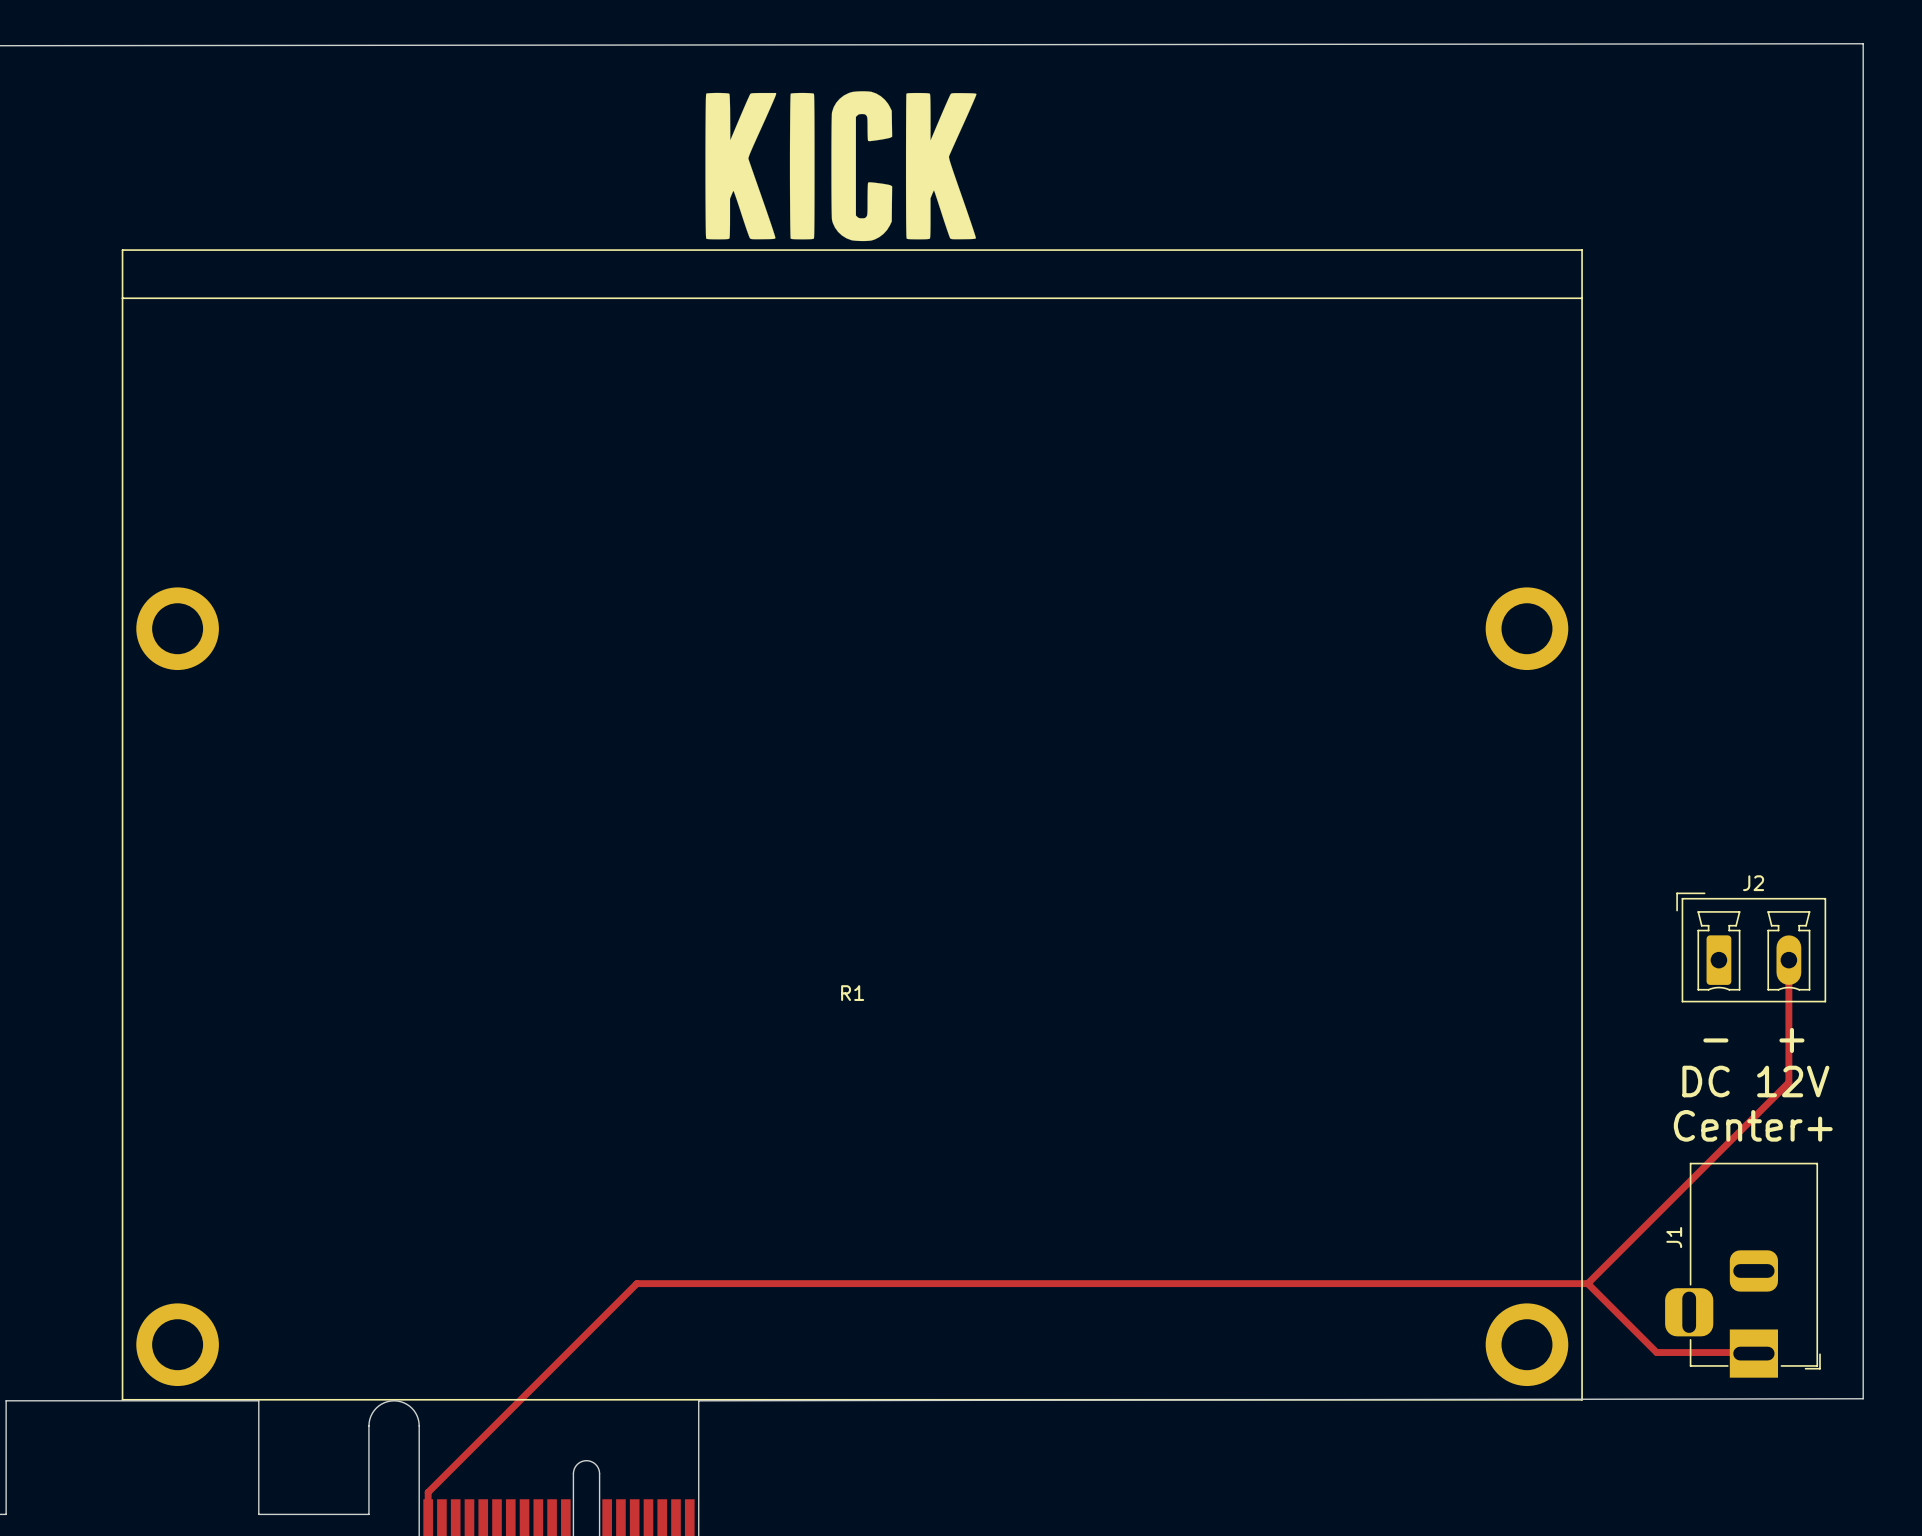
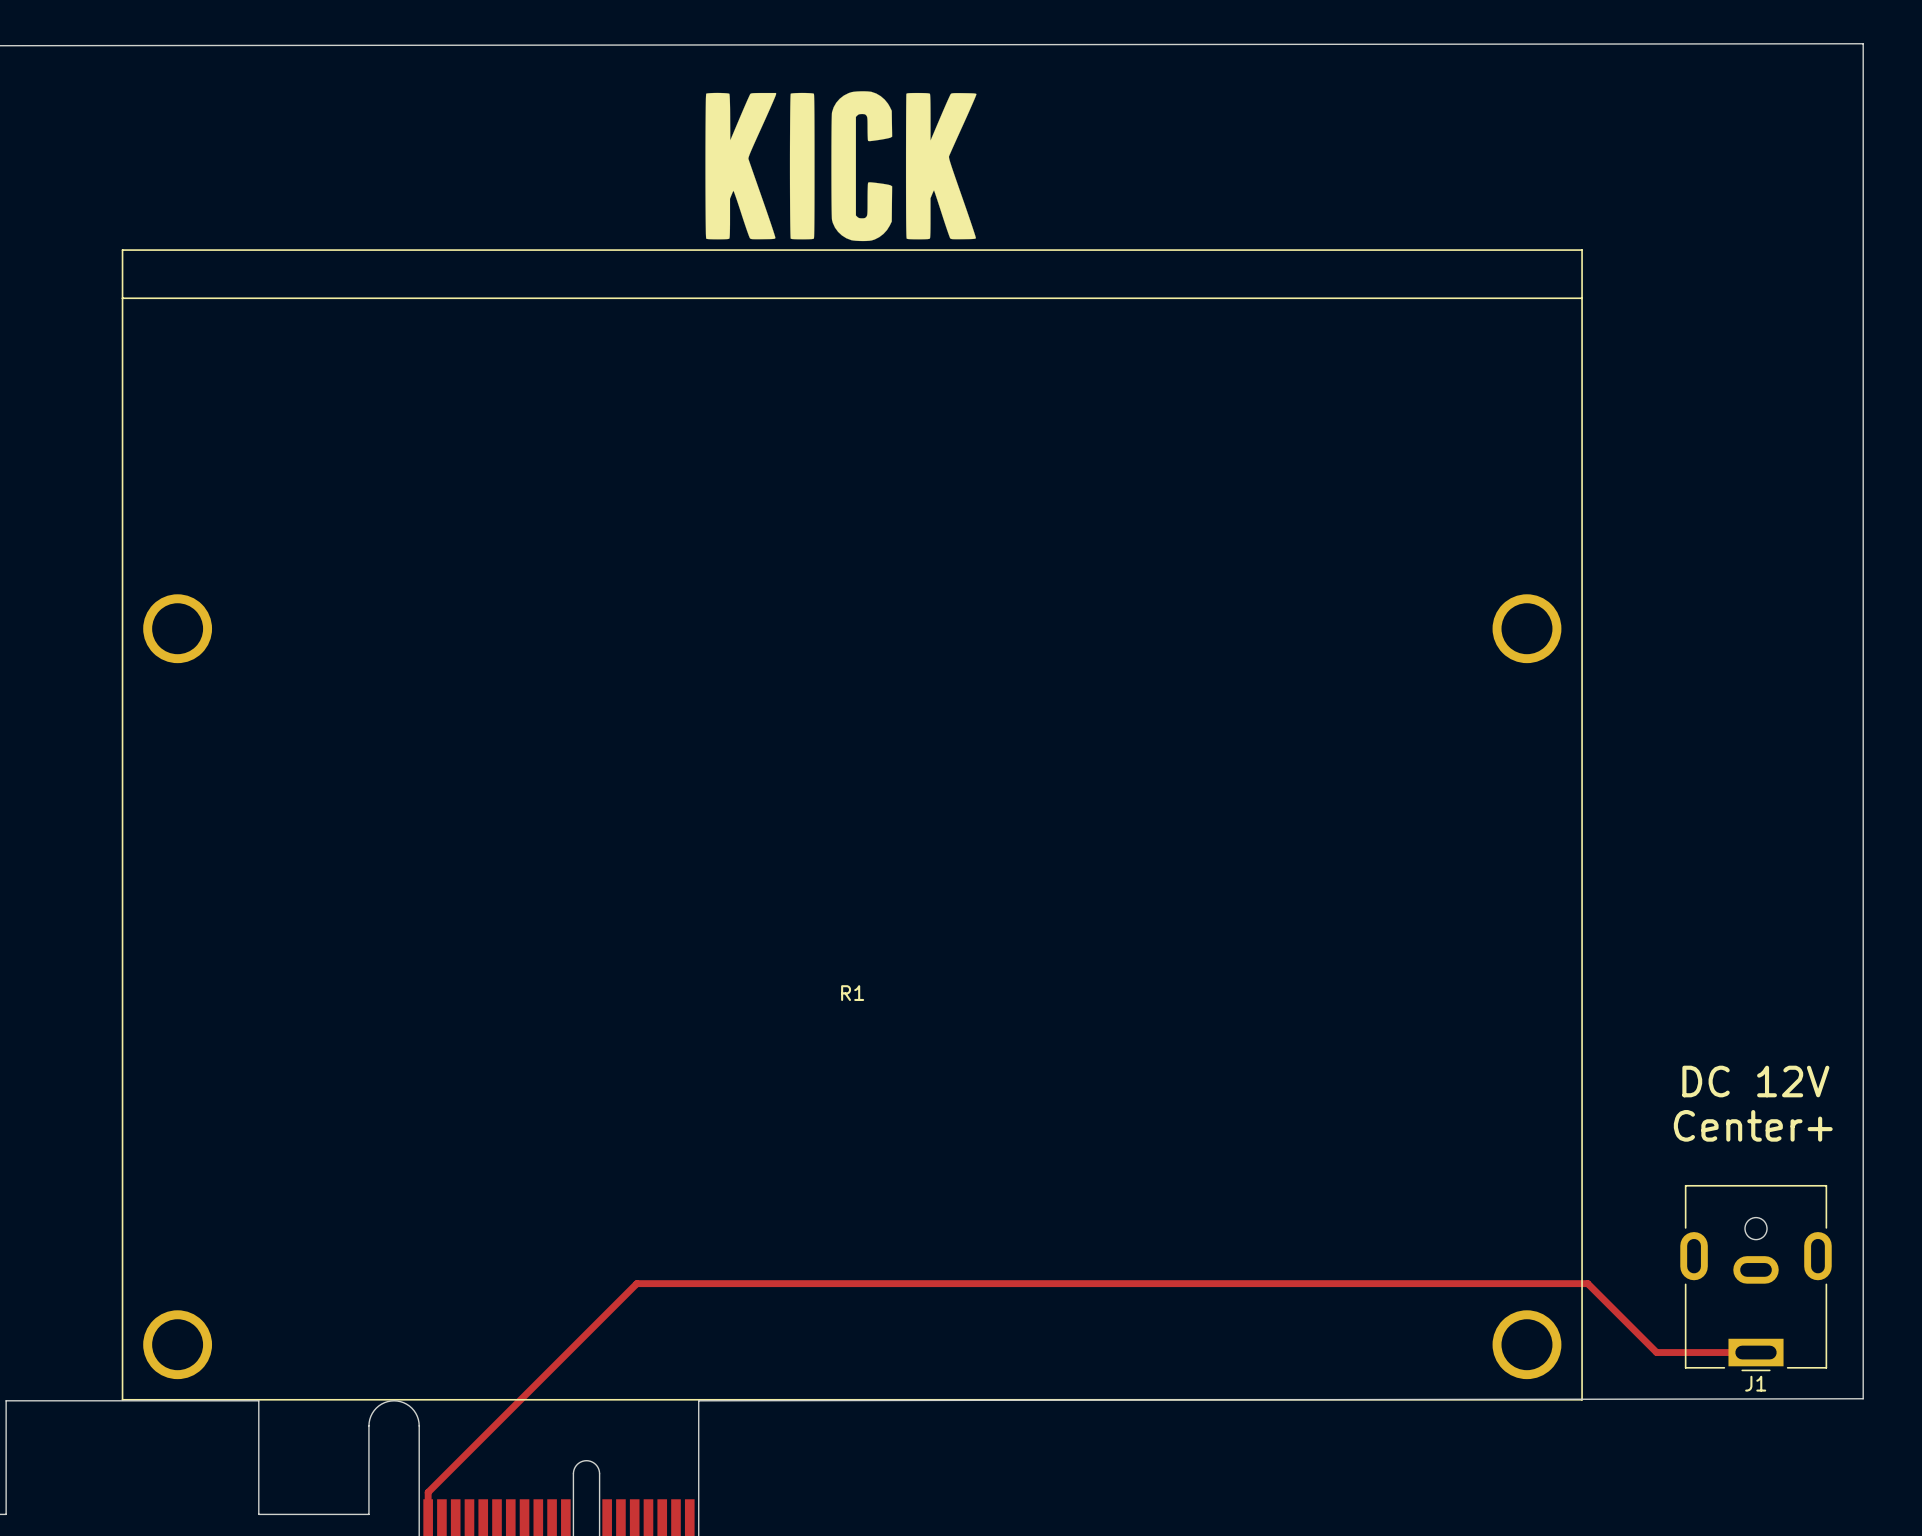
R1 footprint: [121, 249, 1583, 1401] -> [121, 249, 1583, 1401]
J2: (1751, 947) -> none
track: (1788, 960) (1788, 1082) (1587, 1283) -> none
text: - + (1753, 1040) -> none
J1 footprint: [1665, 1162, 1821, 1378] -> [1680, 1184, 1832, 1372]
J1 name position: J1 (1674, 1237) -> J1 (1755, 1383)

